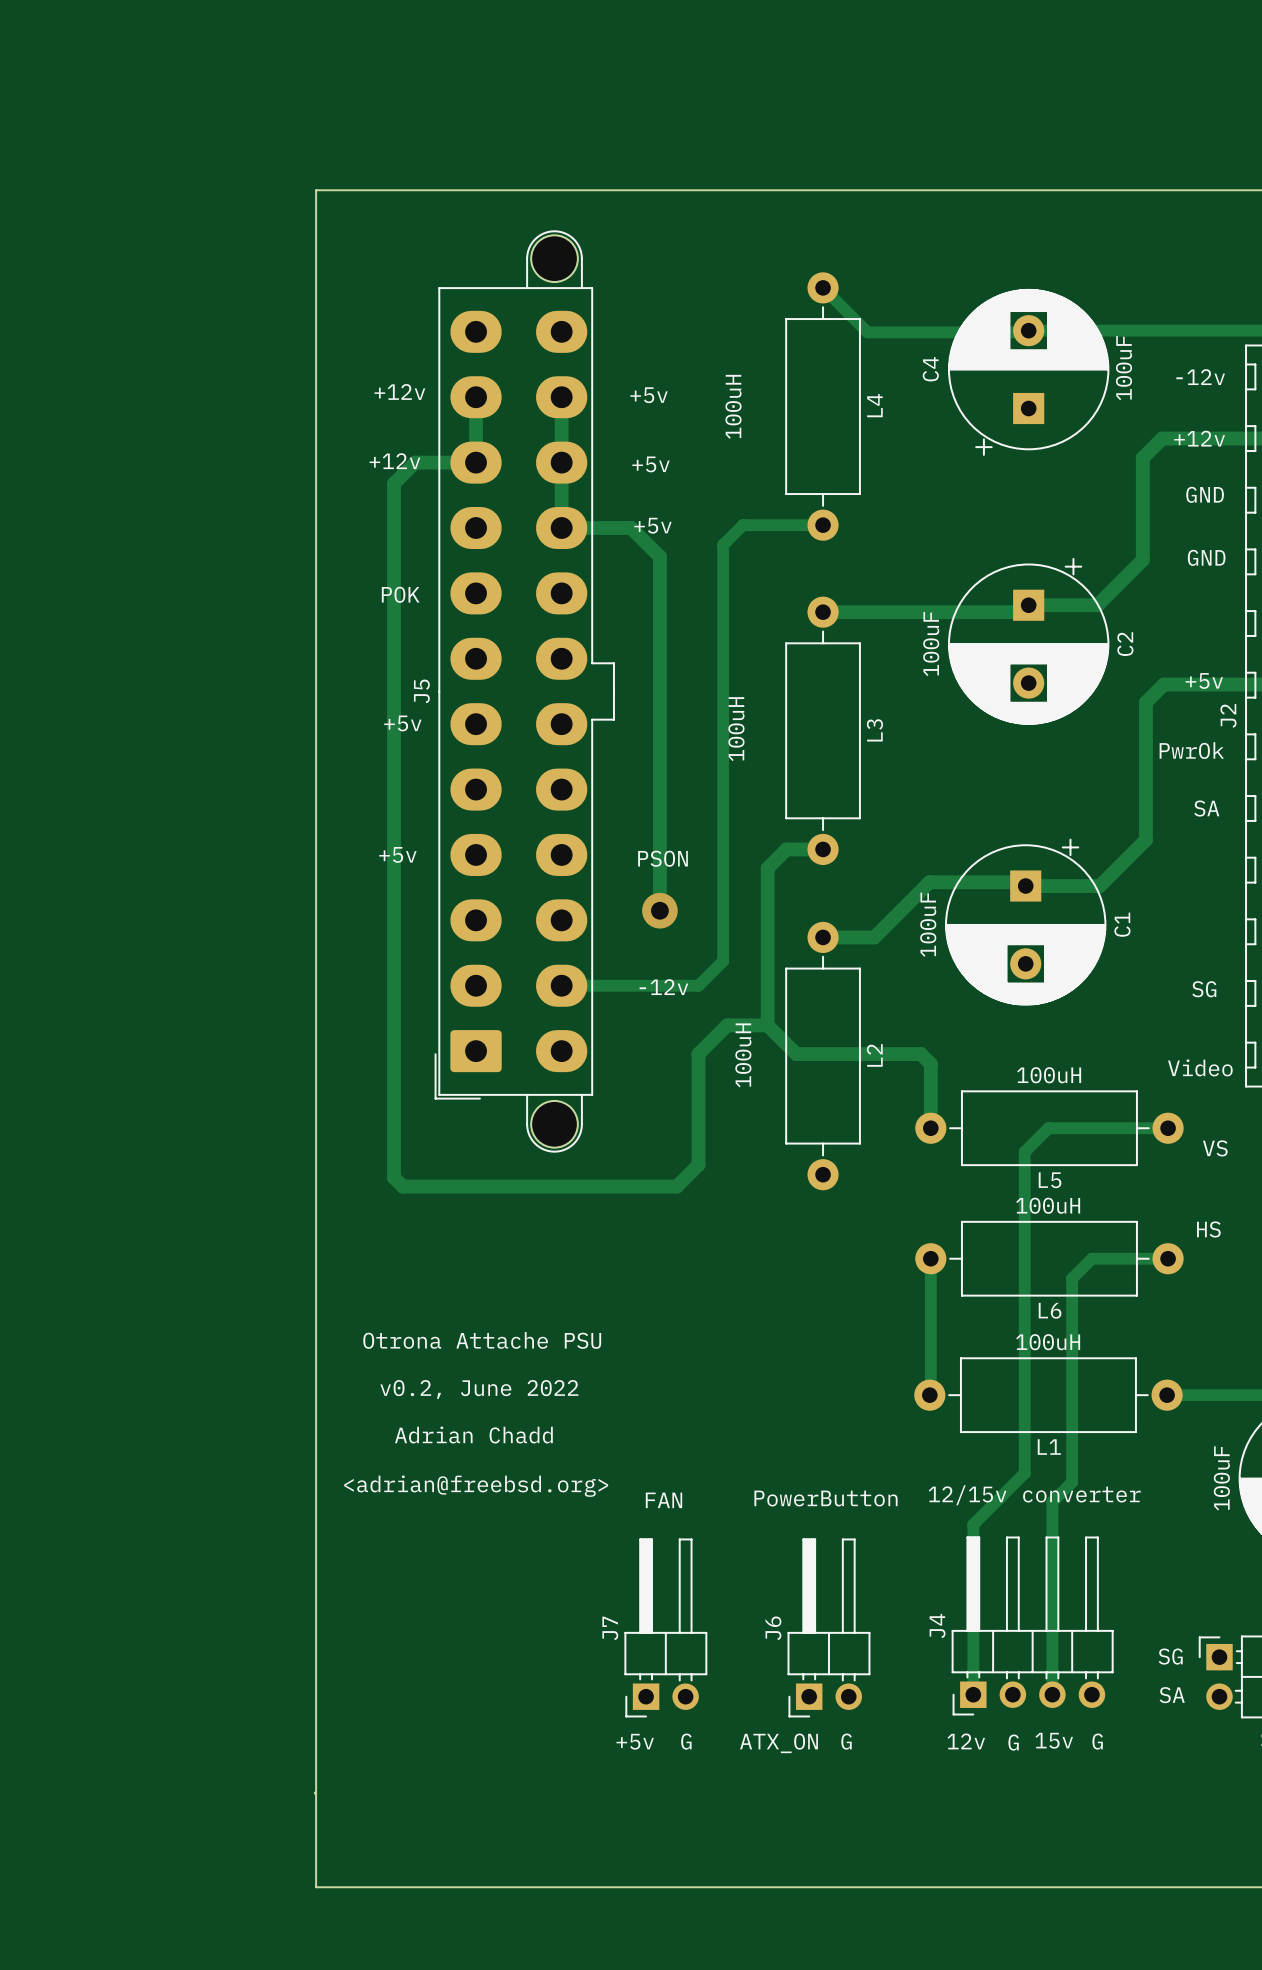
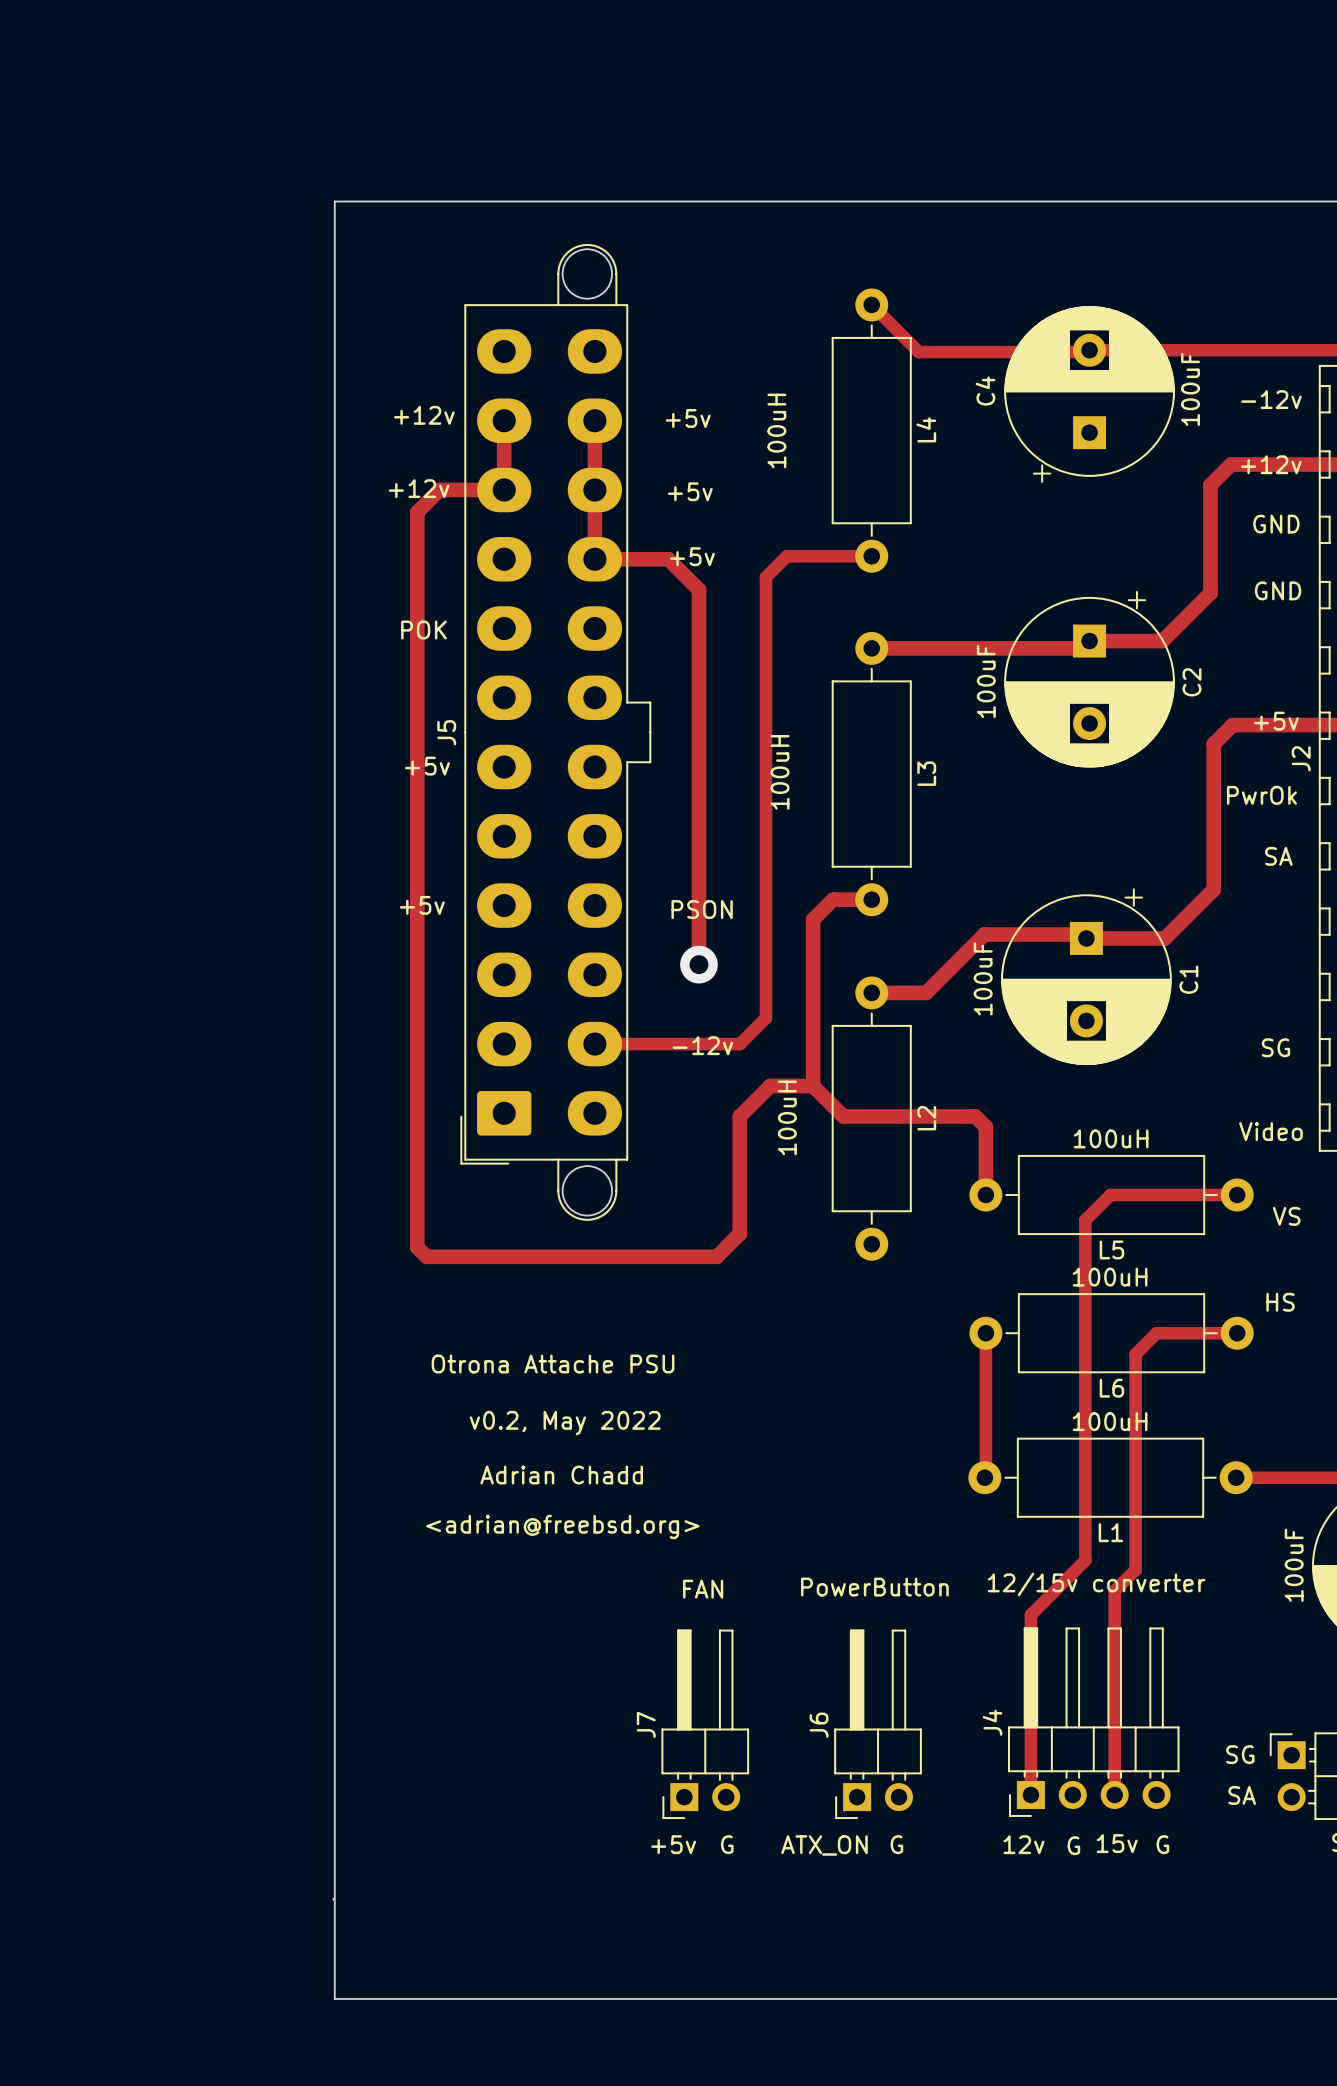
text position: Otrona Attache PSU (482, 1340) -> Otrona Attache PSU (553, 1364)
text: none -> v0.2, May 2022 (565, 1423)
text: v0.2, June 2022 (479, 1389) -> none
text position: Adrian Chadd (473, 1435) -> Adrian Chadd (561, 1475)
text position: <adrian@freebsd.org> (476, 1486) -> <adrian@freebsd.org> (562, 1526)

